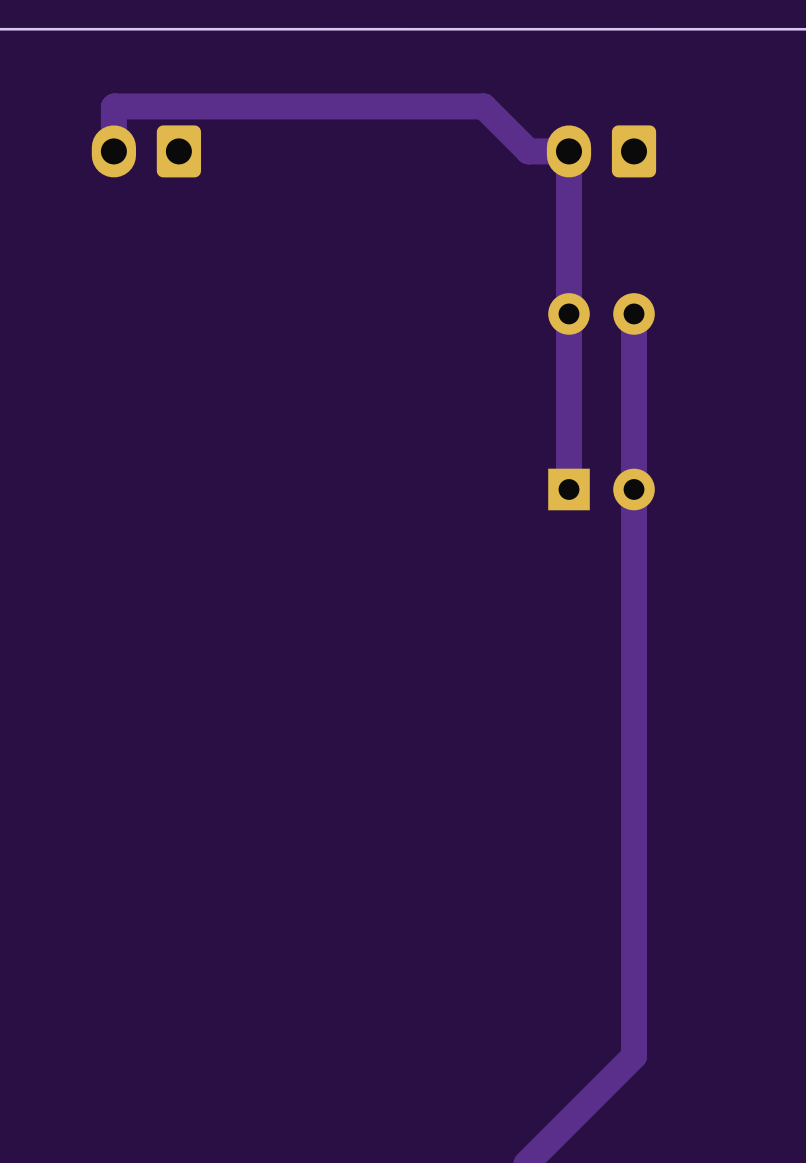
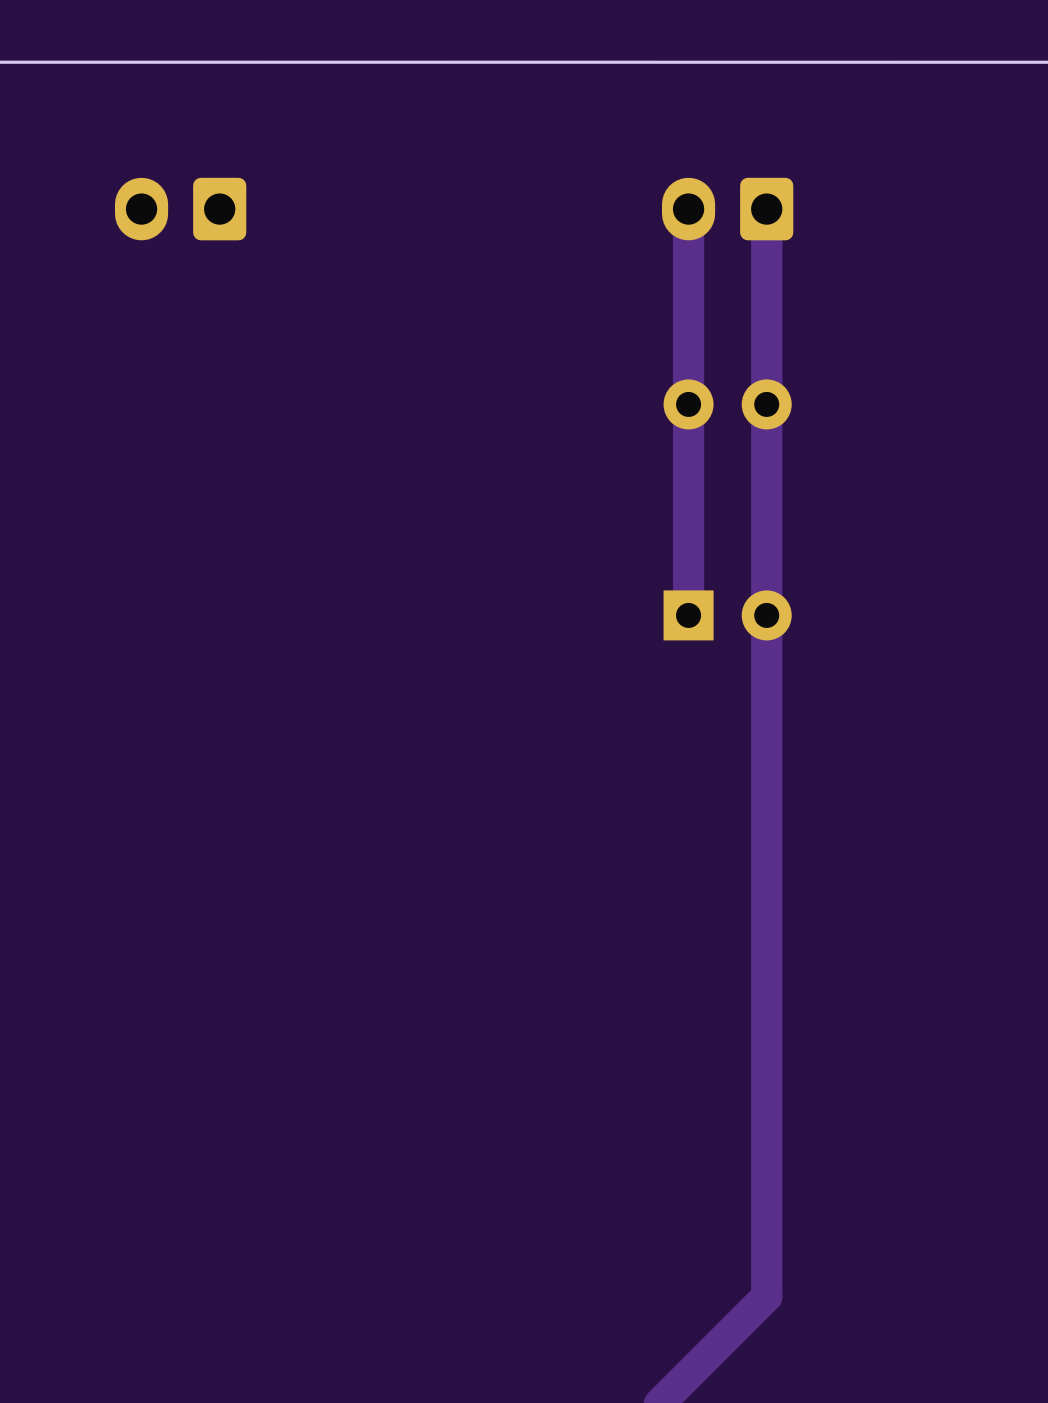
track: (569, 151) (528, 151) (483, 106) (114, 106) (113, 151) -> none
track: none -> (766, 209) (766, 404)

